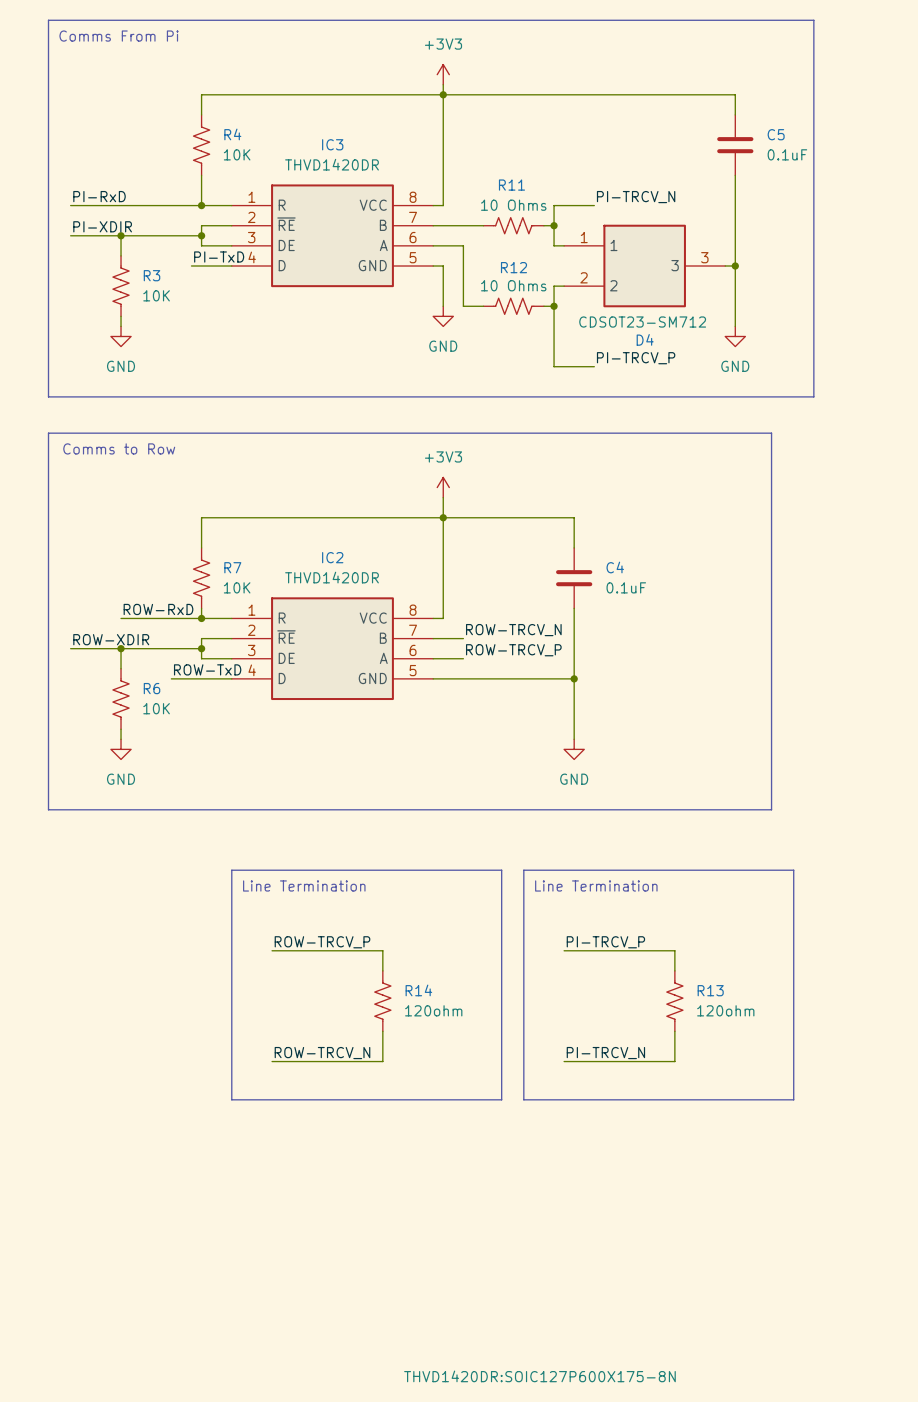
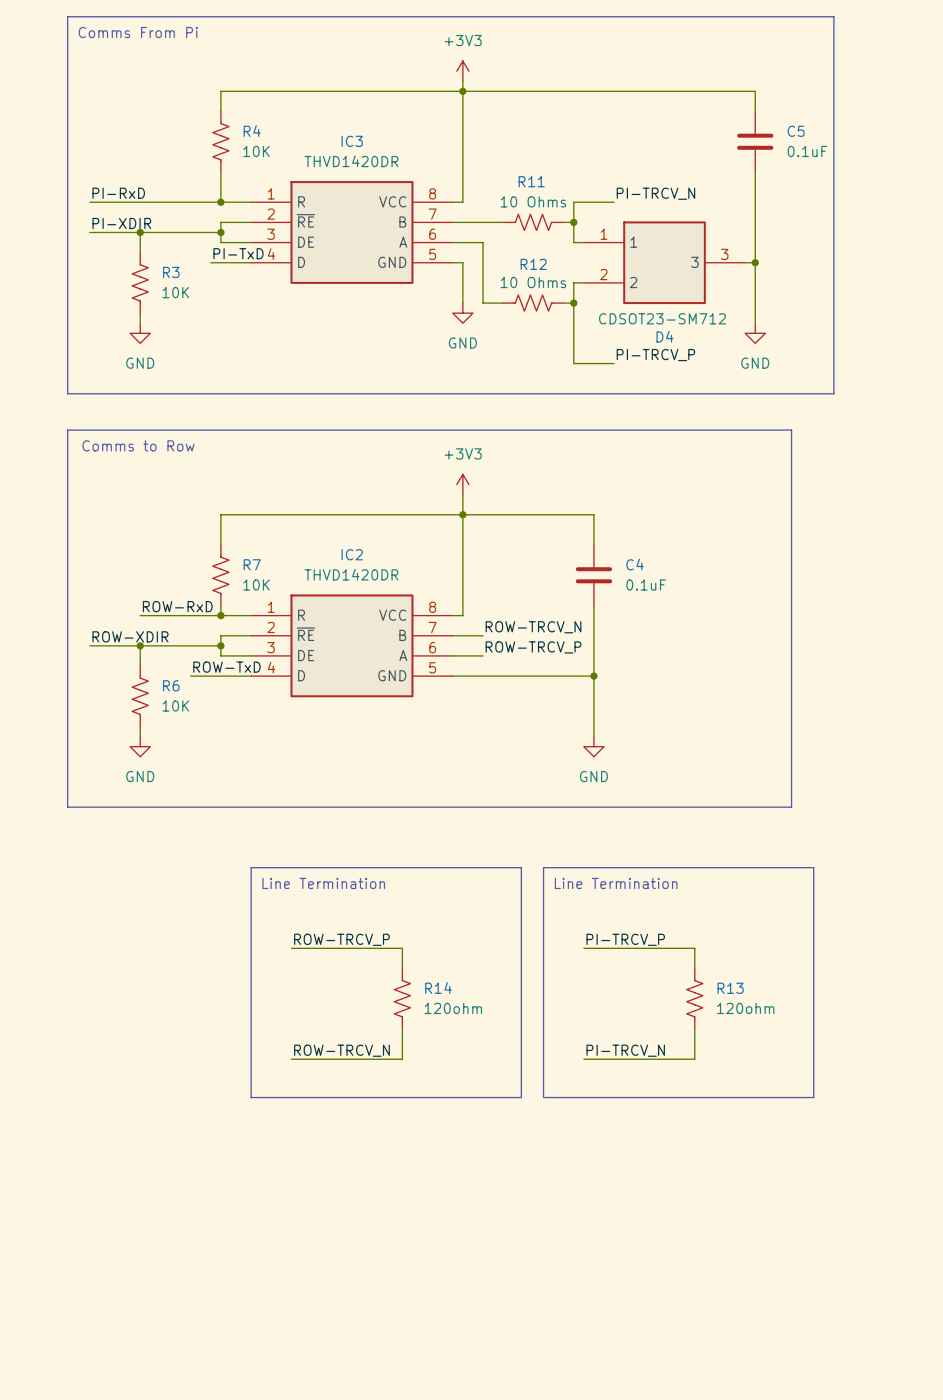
IC2 text: THVD1420DR:SOIC127P600X175-8N (539, 1376) -> none

